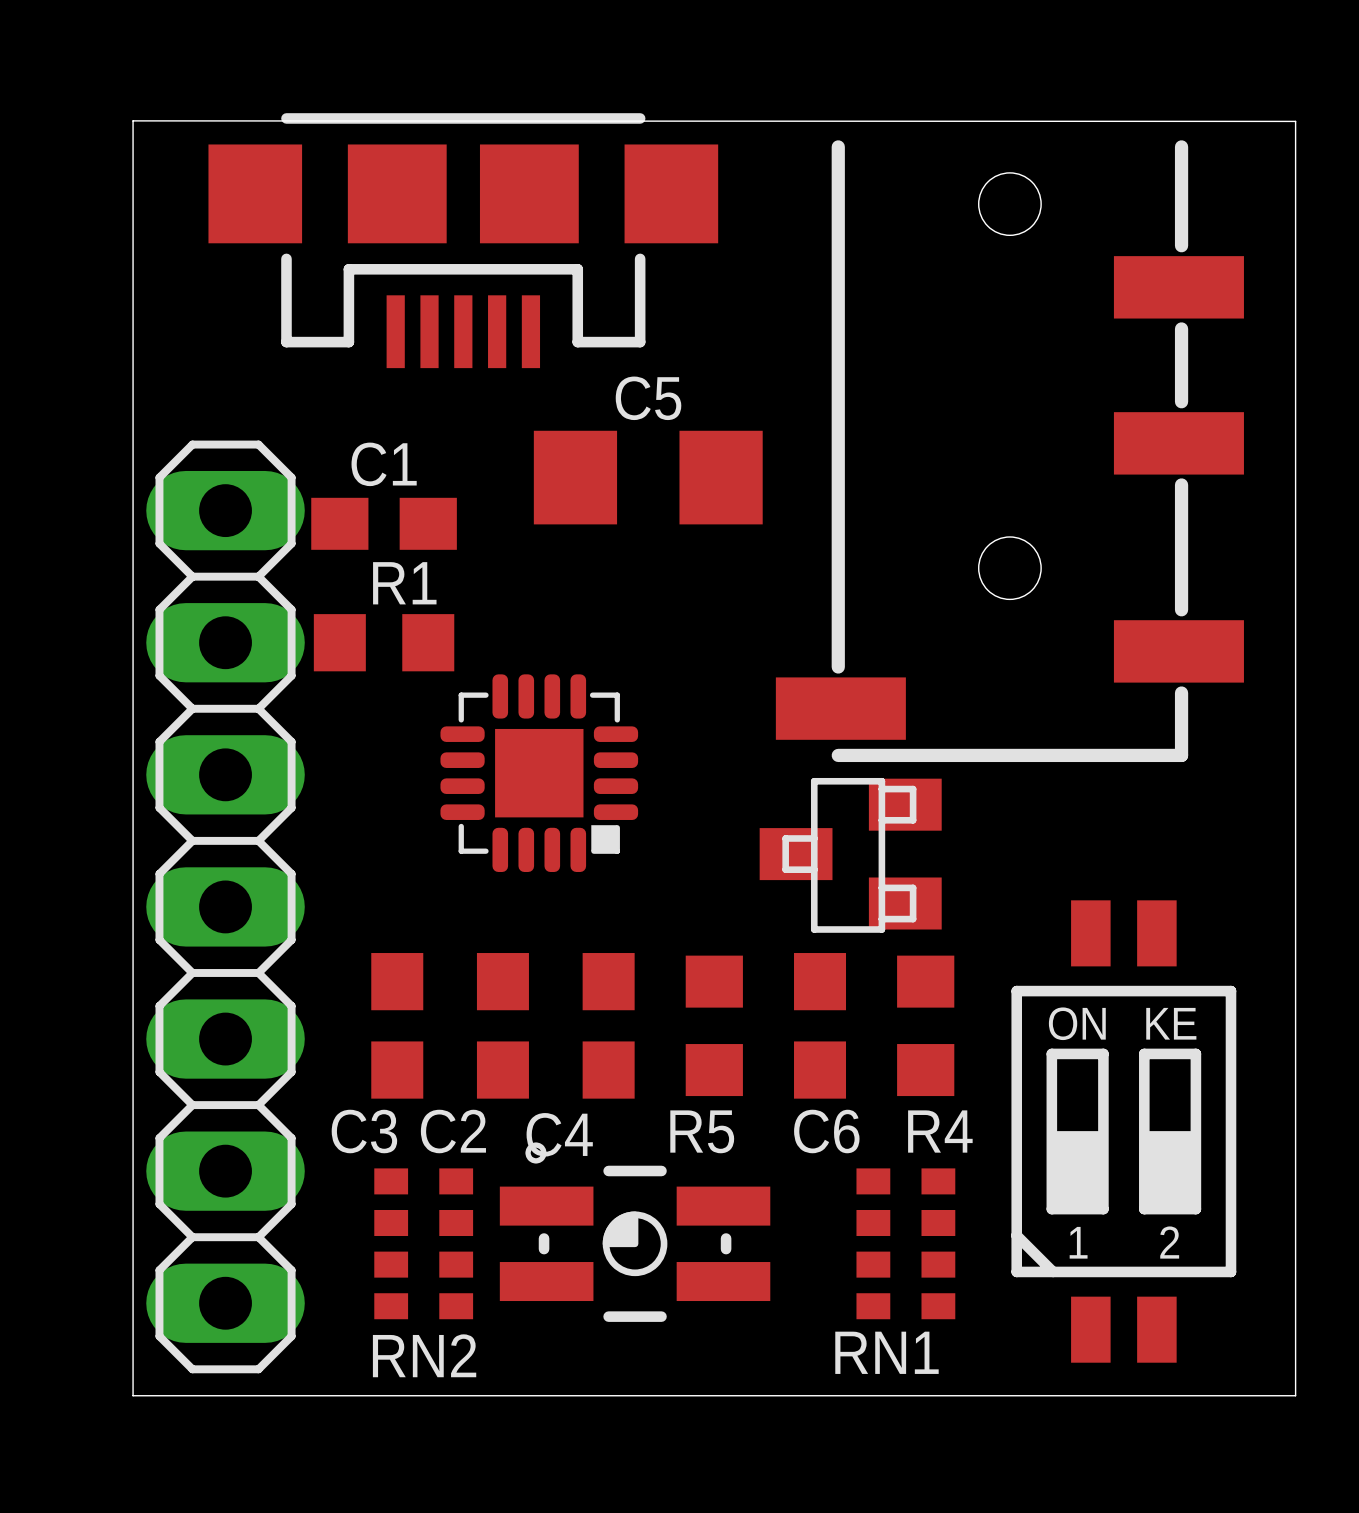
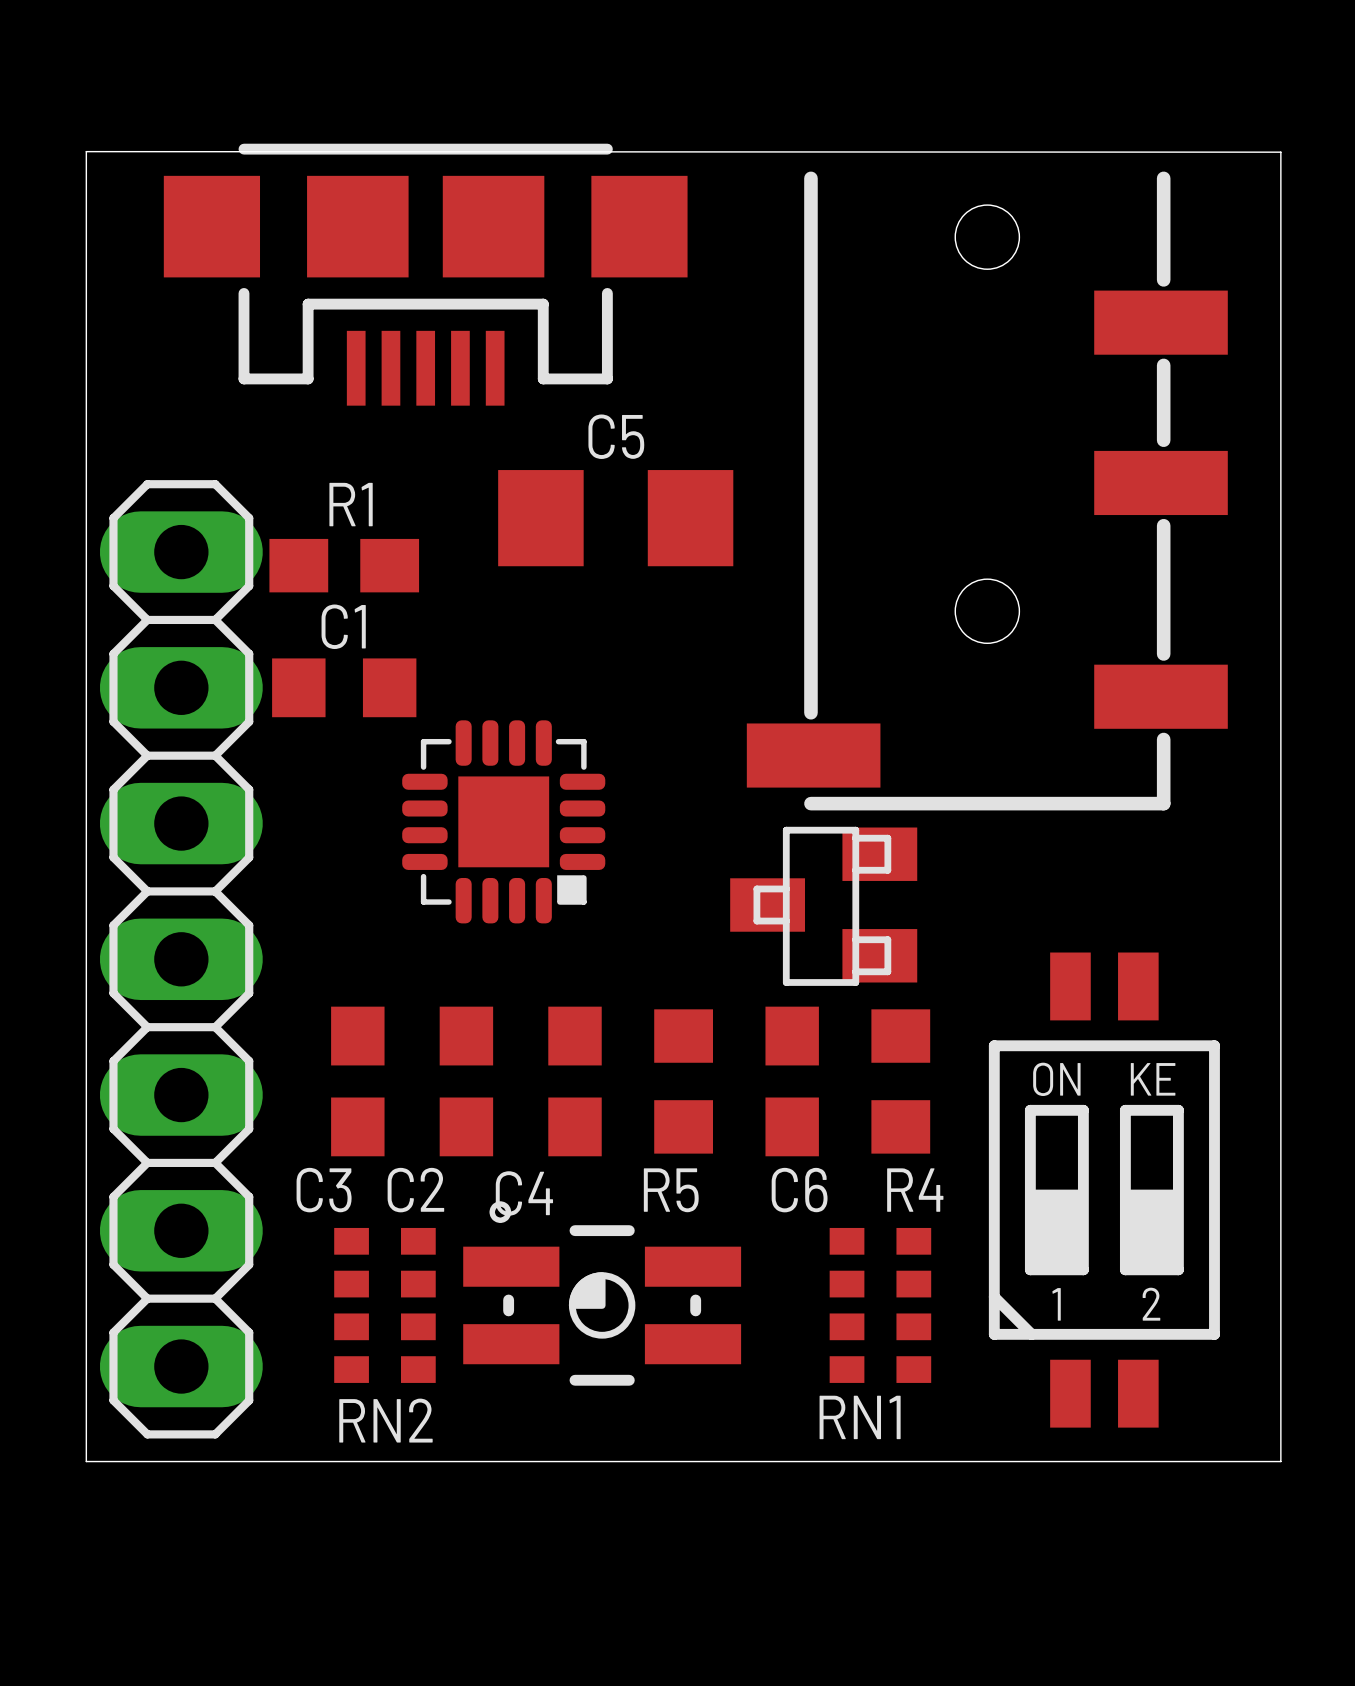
C1 name position: C1 (384, 464) -> C1 (343, 626)
R1 name position: R1 (404, 583) -> R1 (351, 504)

